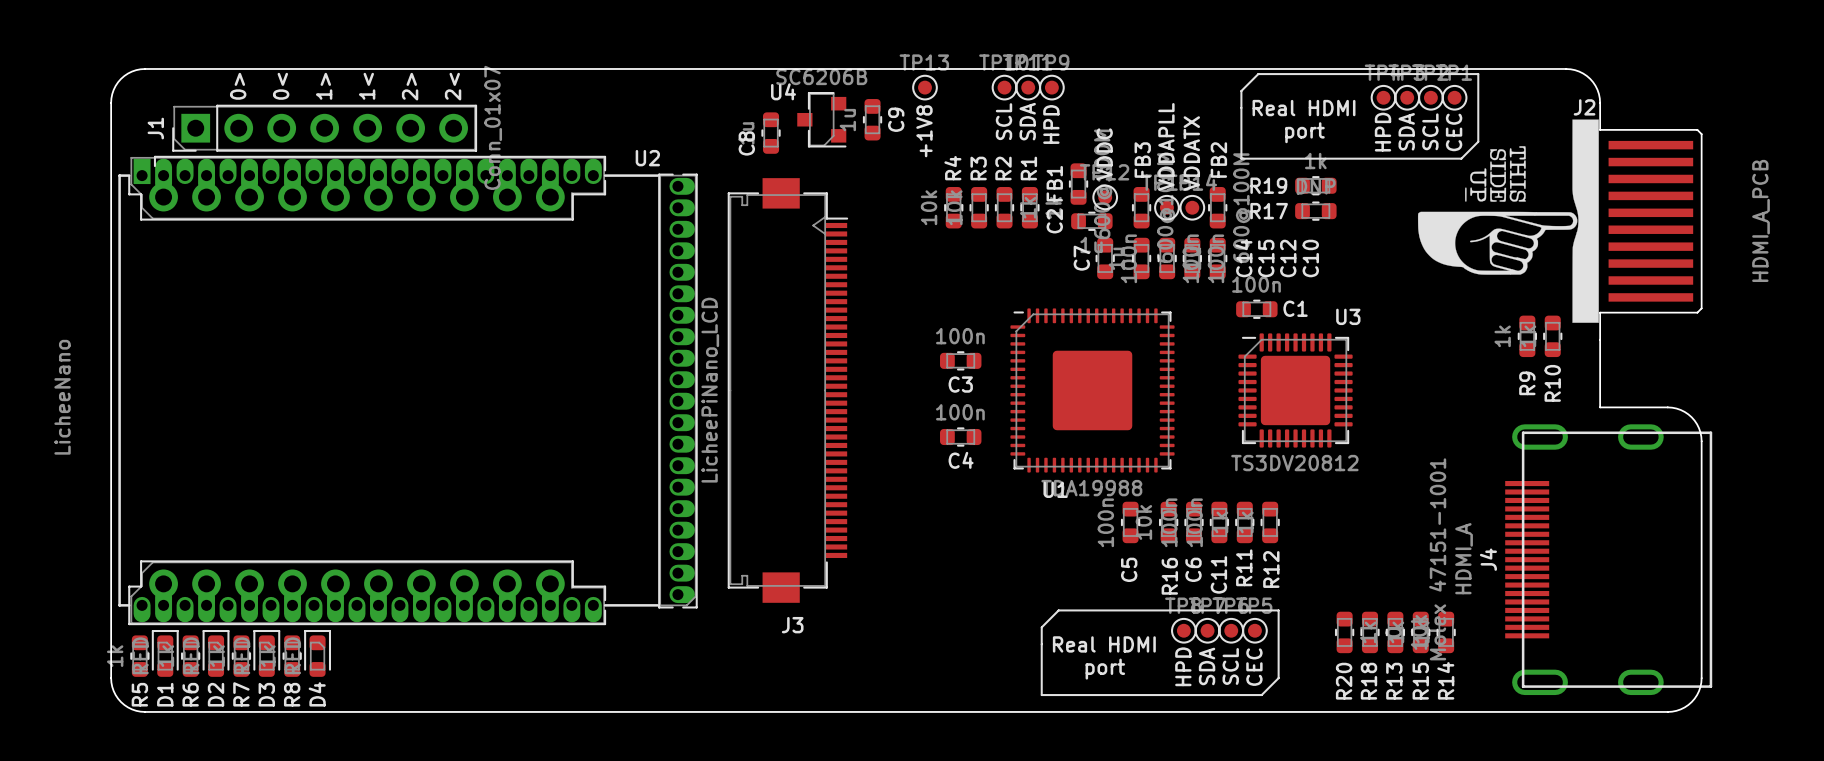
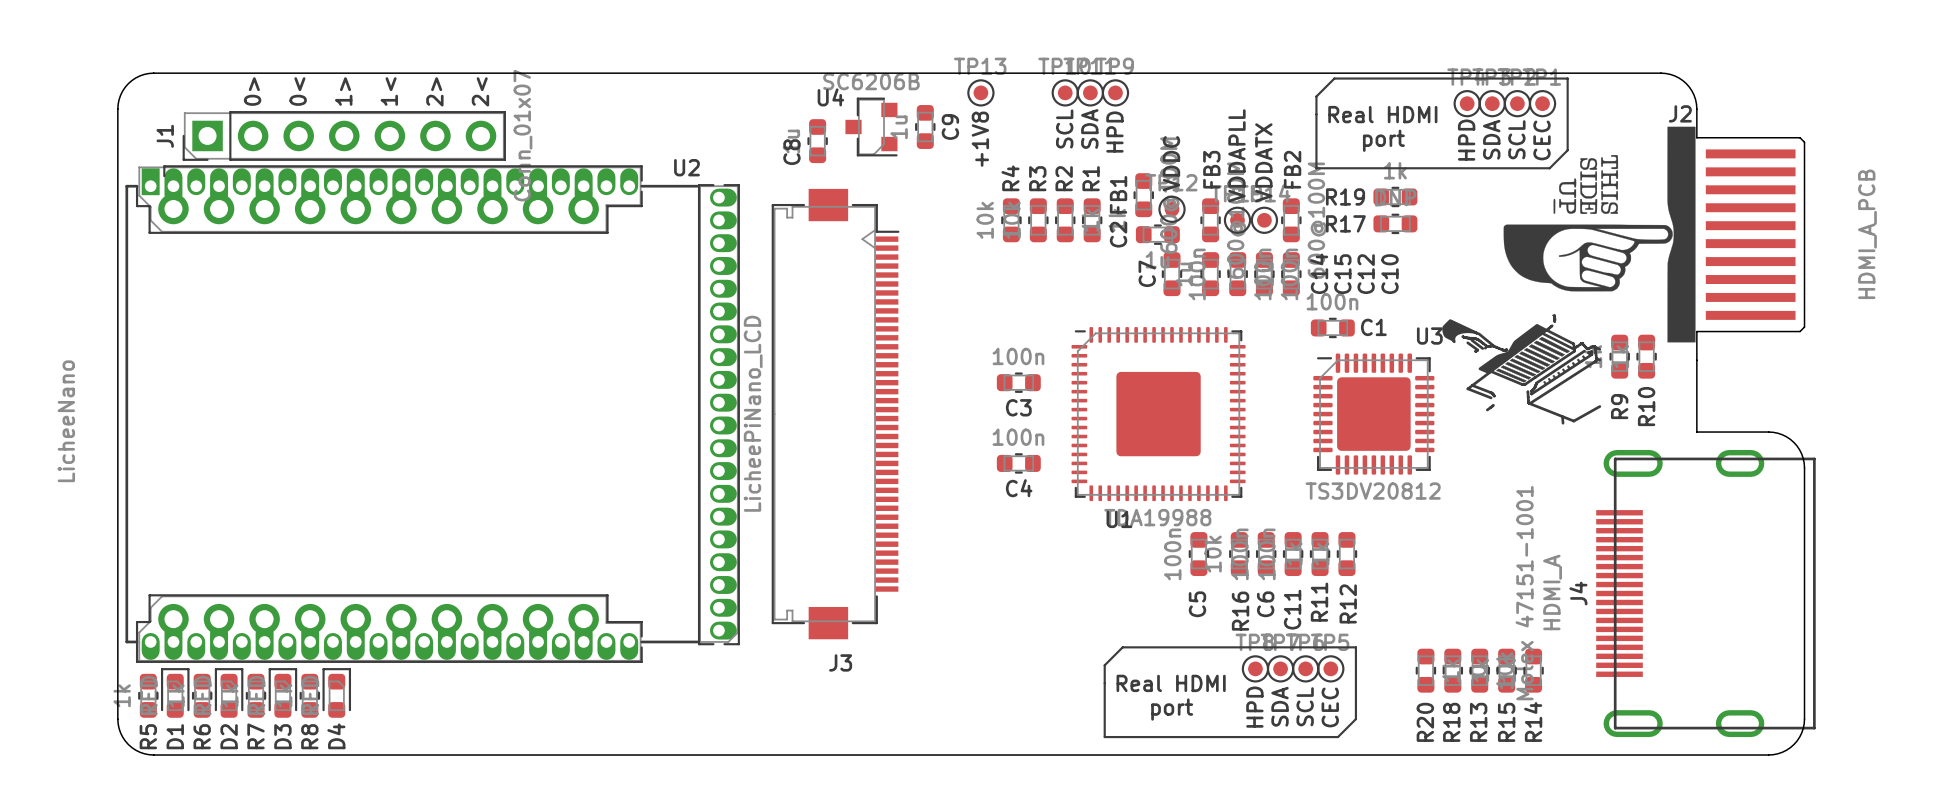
line: none -> (1554, 315) (1554, 318)
drawing: none -> [1442, 319, 1587, 386]
line: none -> (1552, 325) (1546, 330) (1573, 343) (1574, 348) (1581, 343)
line: none -> (1478, 333) (1494, 346)
line: none -> (1542, 333) (1574, 349)
line: none -> (1462, 336) (1473, 338)
line: none -> (1474, 338) (1487, 346)
line: none -> (1471, 340) (1482, 348)
line: none -> (1467, 342) (1477, 350)
line: none -> (1582, 343) (1586, 348)
line: none -> (1488, 346) (1493, 346) (1504, 350)
line: none -> (1593, 346) (1588, 348)
line: none -> (1594, 346) (1599, 349)
line: none -> (1594, 347) (1596, 358) (1599, 359)
line: none -> (1485, 348) (1485, 348)
line: none -> (1574, 348) (1574, 351) (1525, 384) (1491, 371) (1467, 388) (1491, 397)
line: none -> (1477, 350) (1475, 351)
line: none -> (1584, 351) (1536, 383)
line: none -> (1589, 352) (1591, 351) (1591, 354) (1531, 394) (1532, 390)
line: none -> (1595, 361) (1529, 403)
line: none -> (1536, 383) (1533, 389)
line: none -> (1472, 385) (1490, 392)
line: none -> (1527, 391) (1528, 402)
line: none -> (1492, 393) (1494, 396)
line: none -> (1529, 403) (1573, 421) (1599, 406)
line: none -> (1493, 405) (1487, 410)
line: none -> (1562, 416) (1563, 423)

